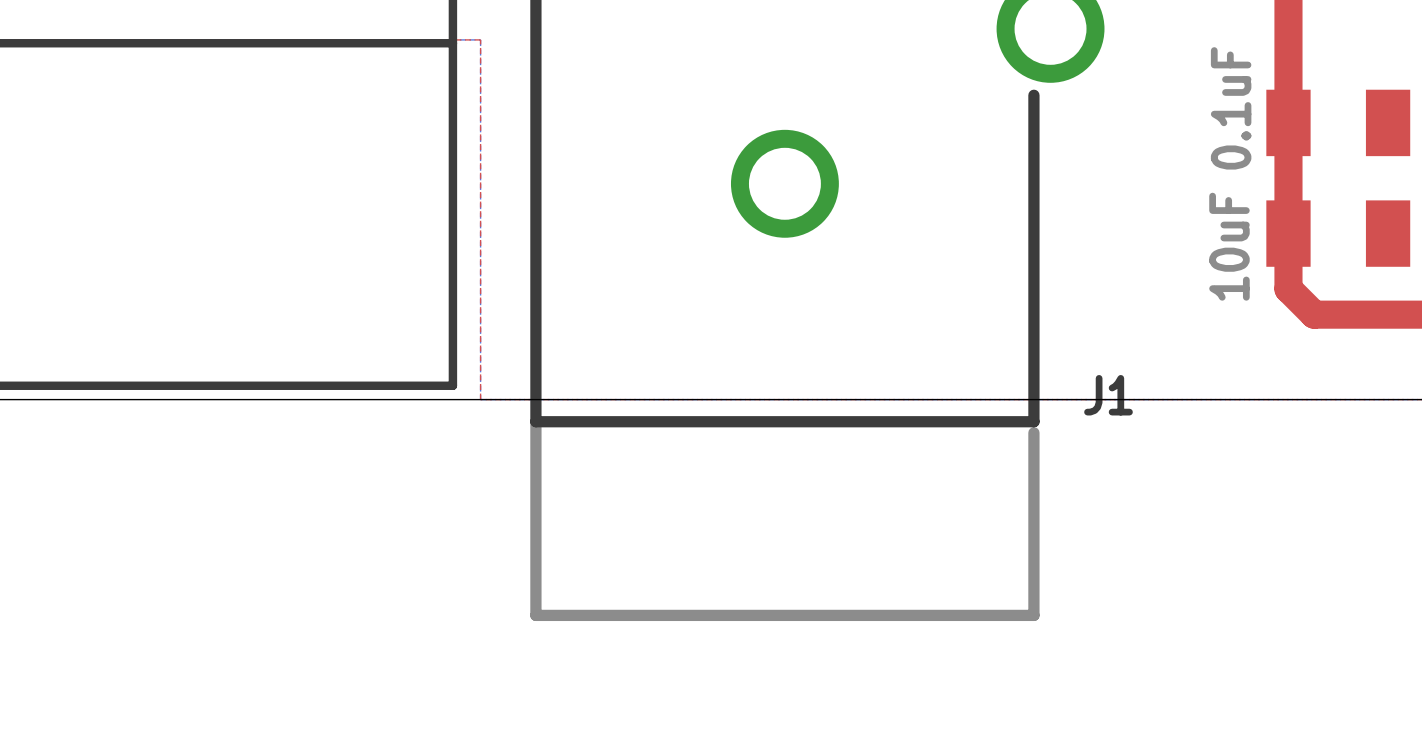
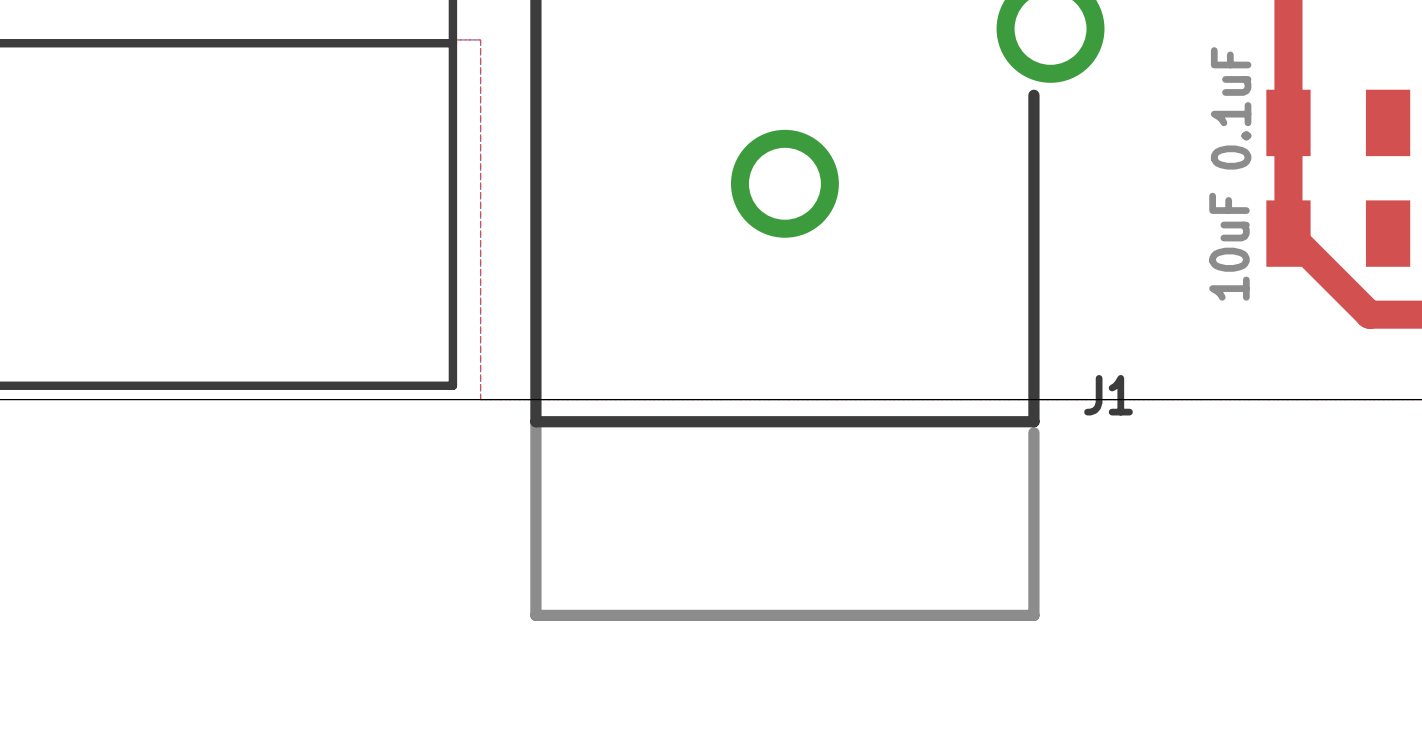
top track: (1288, 233) (1288, 288) (1314, 314) (1369, 314) -> (1288, 233) (1369, 314)

